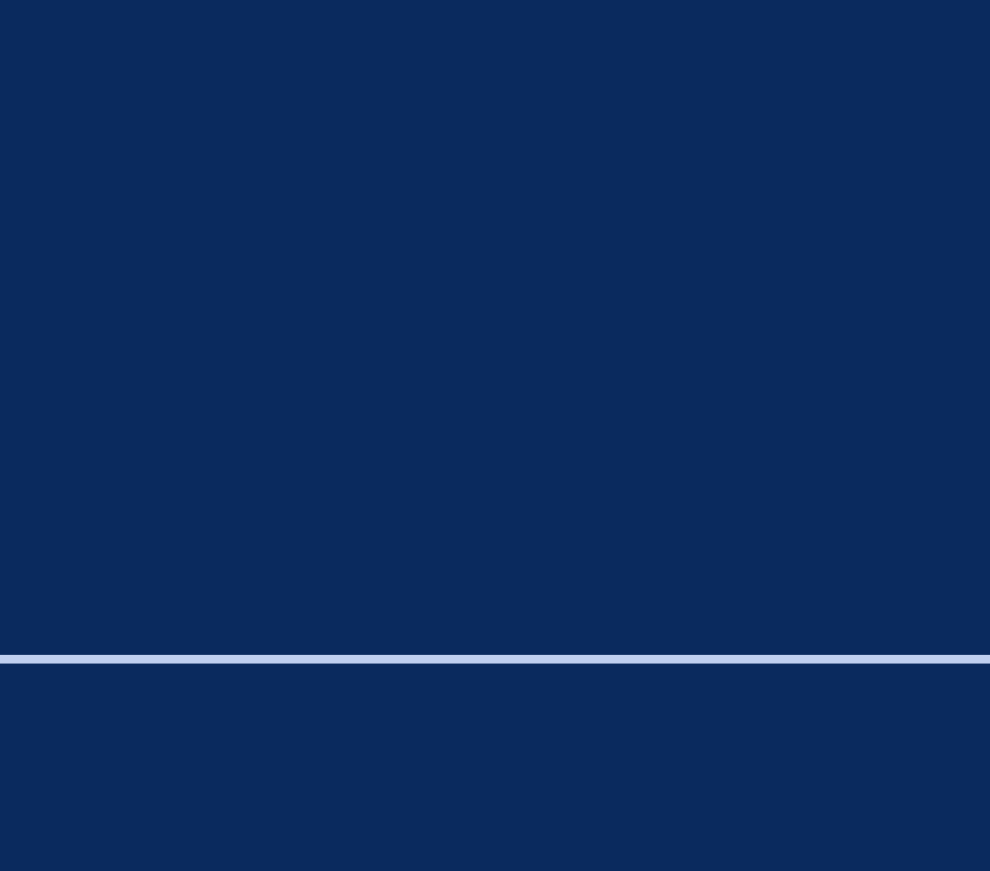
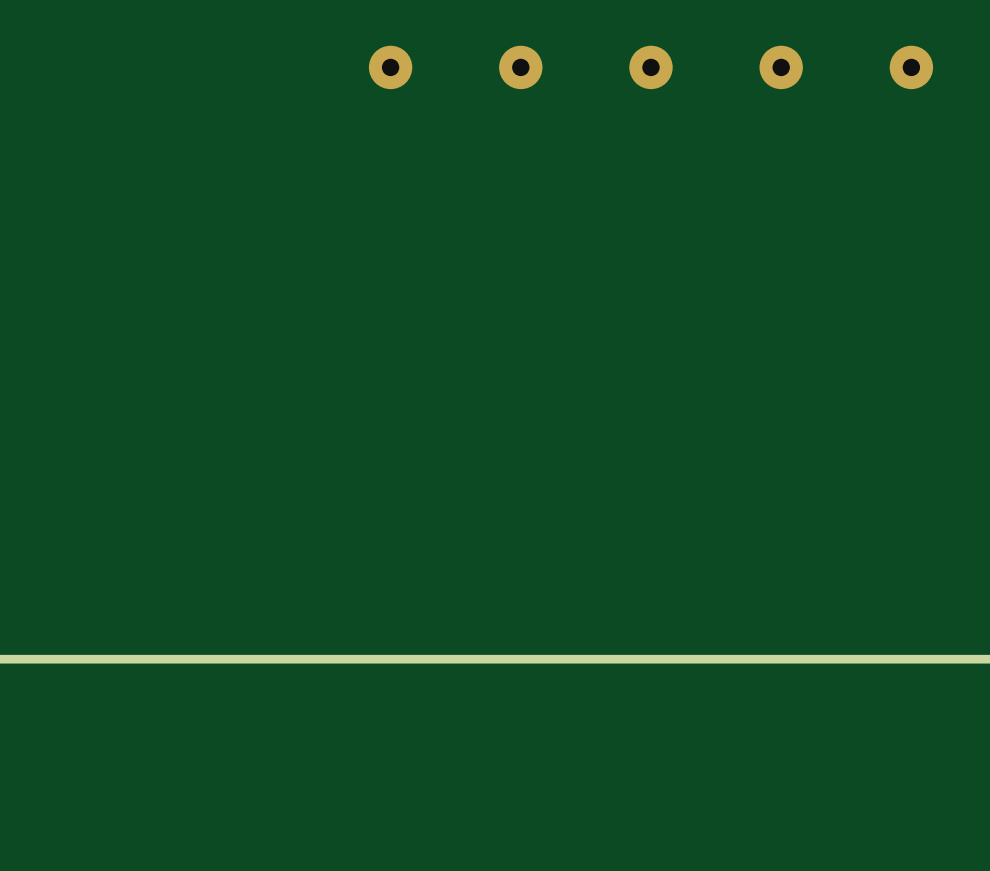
via: none -> (390, 67)
via: none -> (520, 67)
via: none -> (650, 67)
via: none -> (781, 67)
via: none -> (911, 67)

